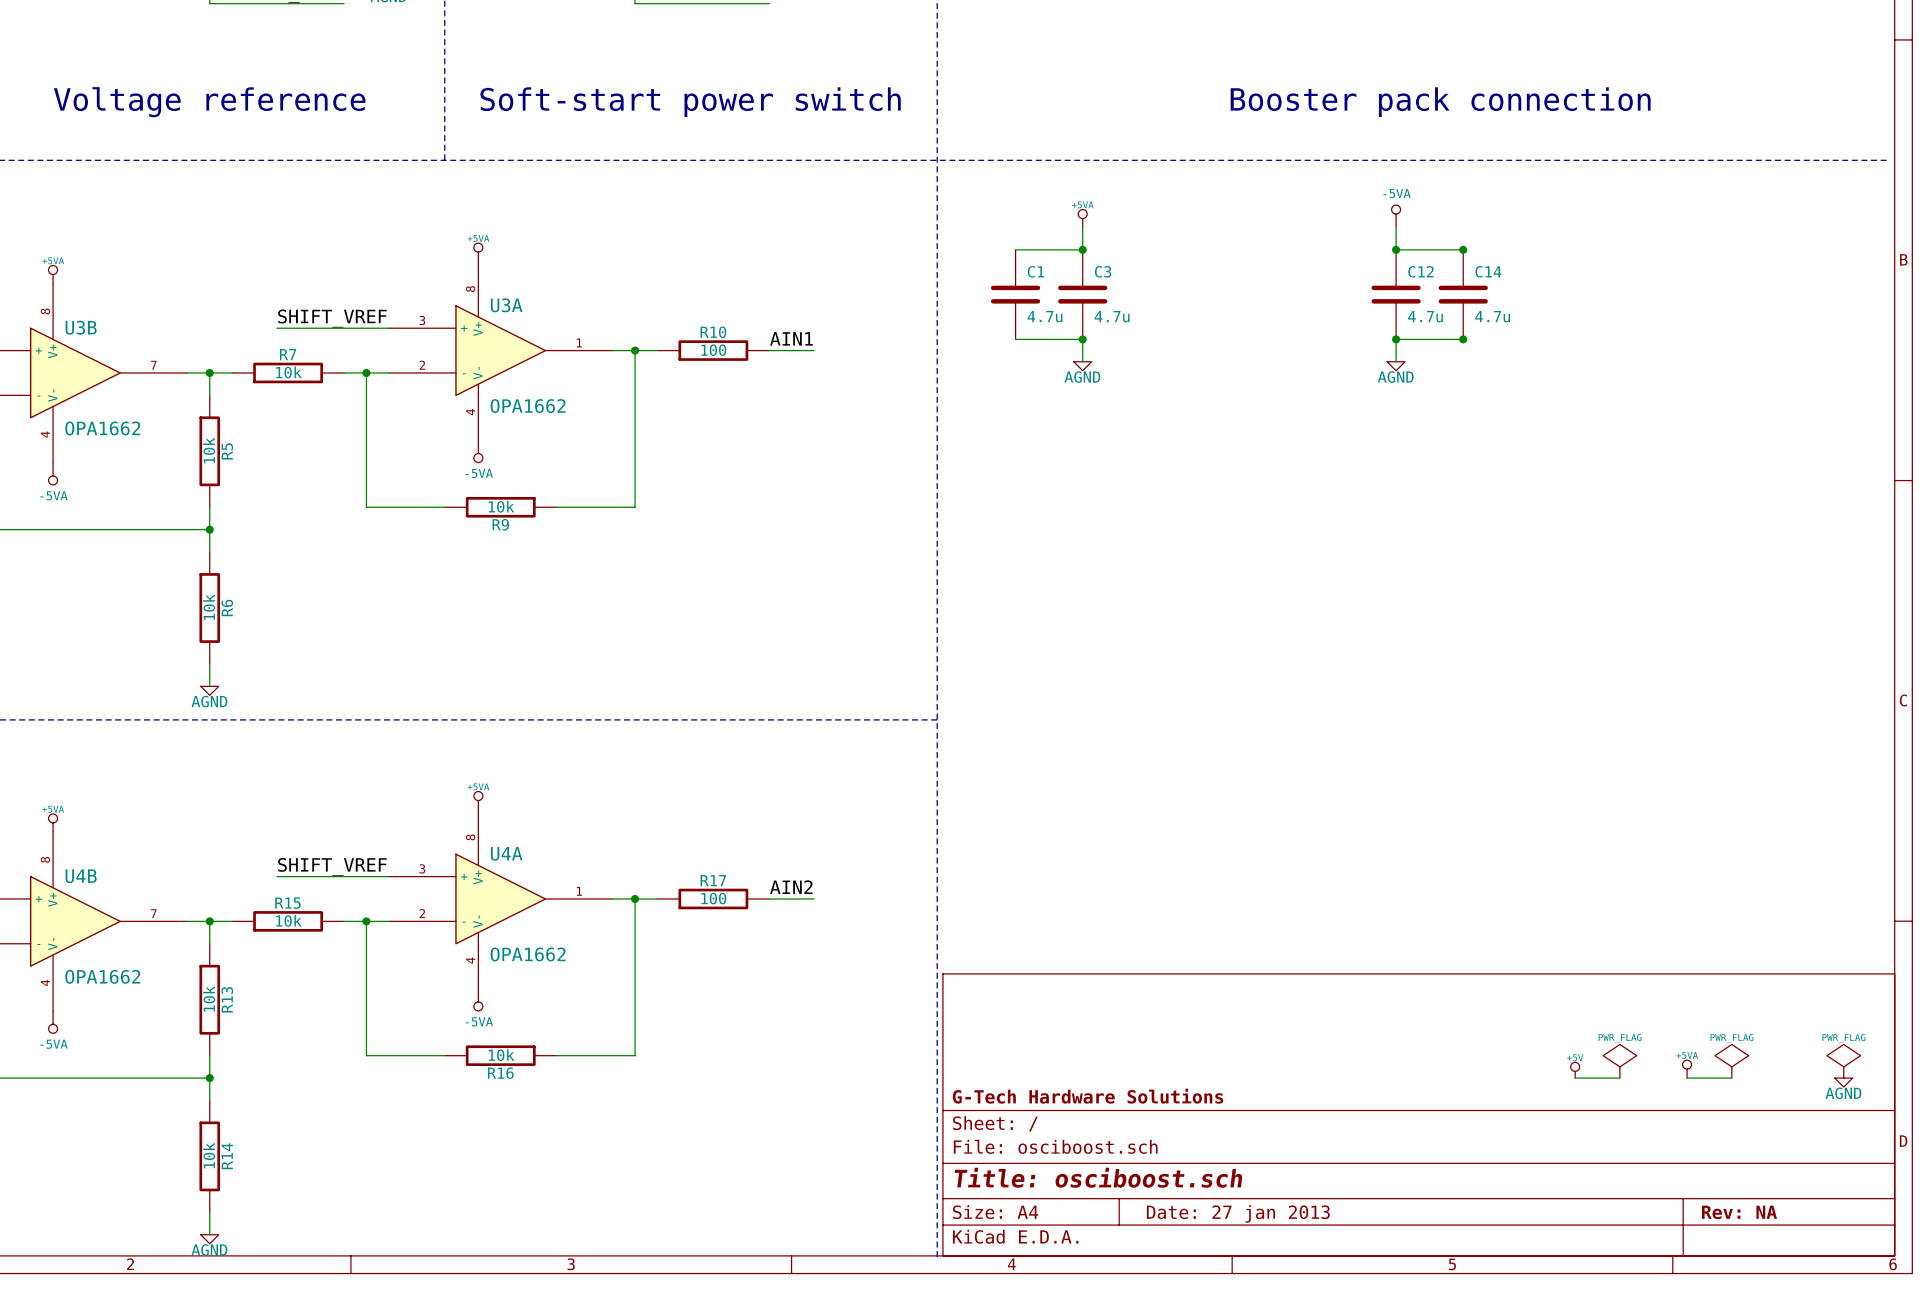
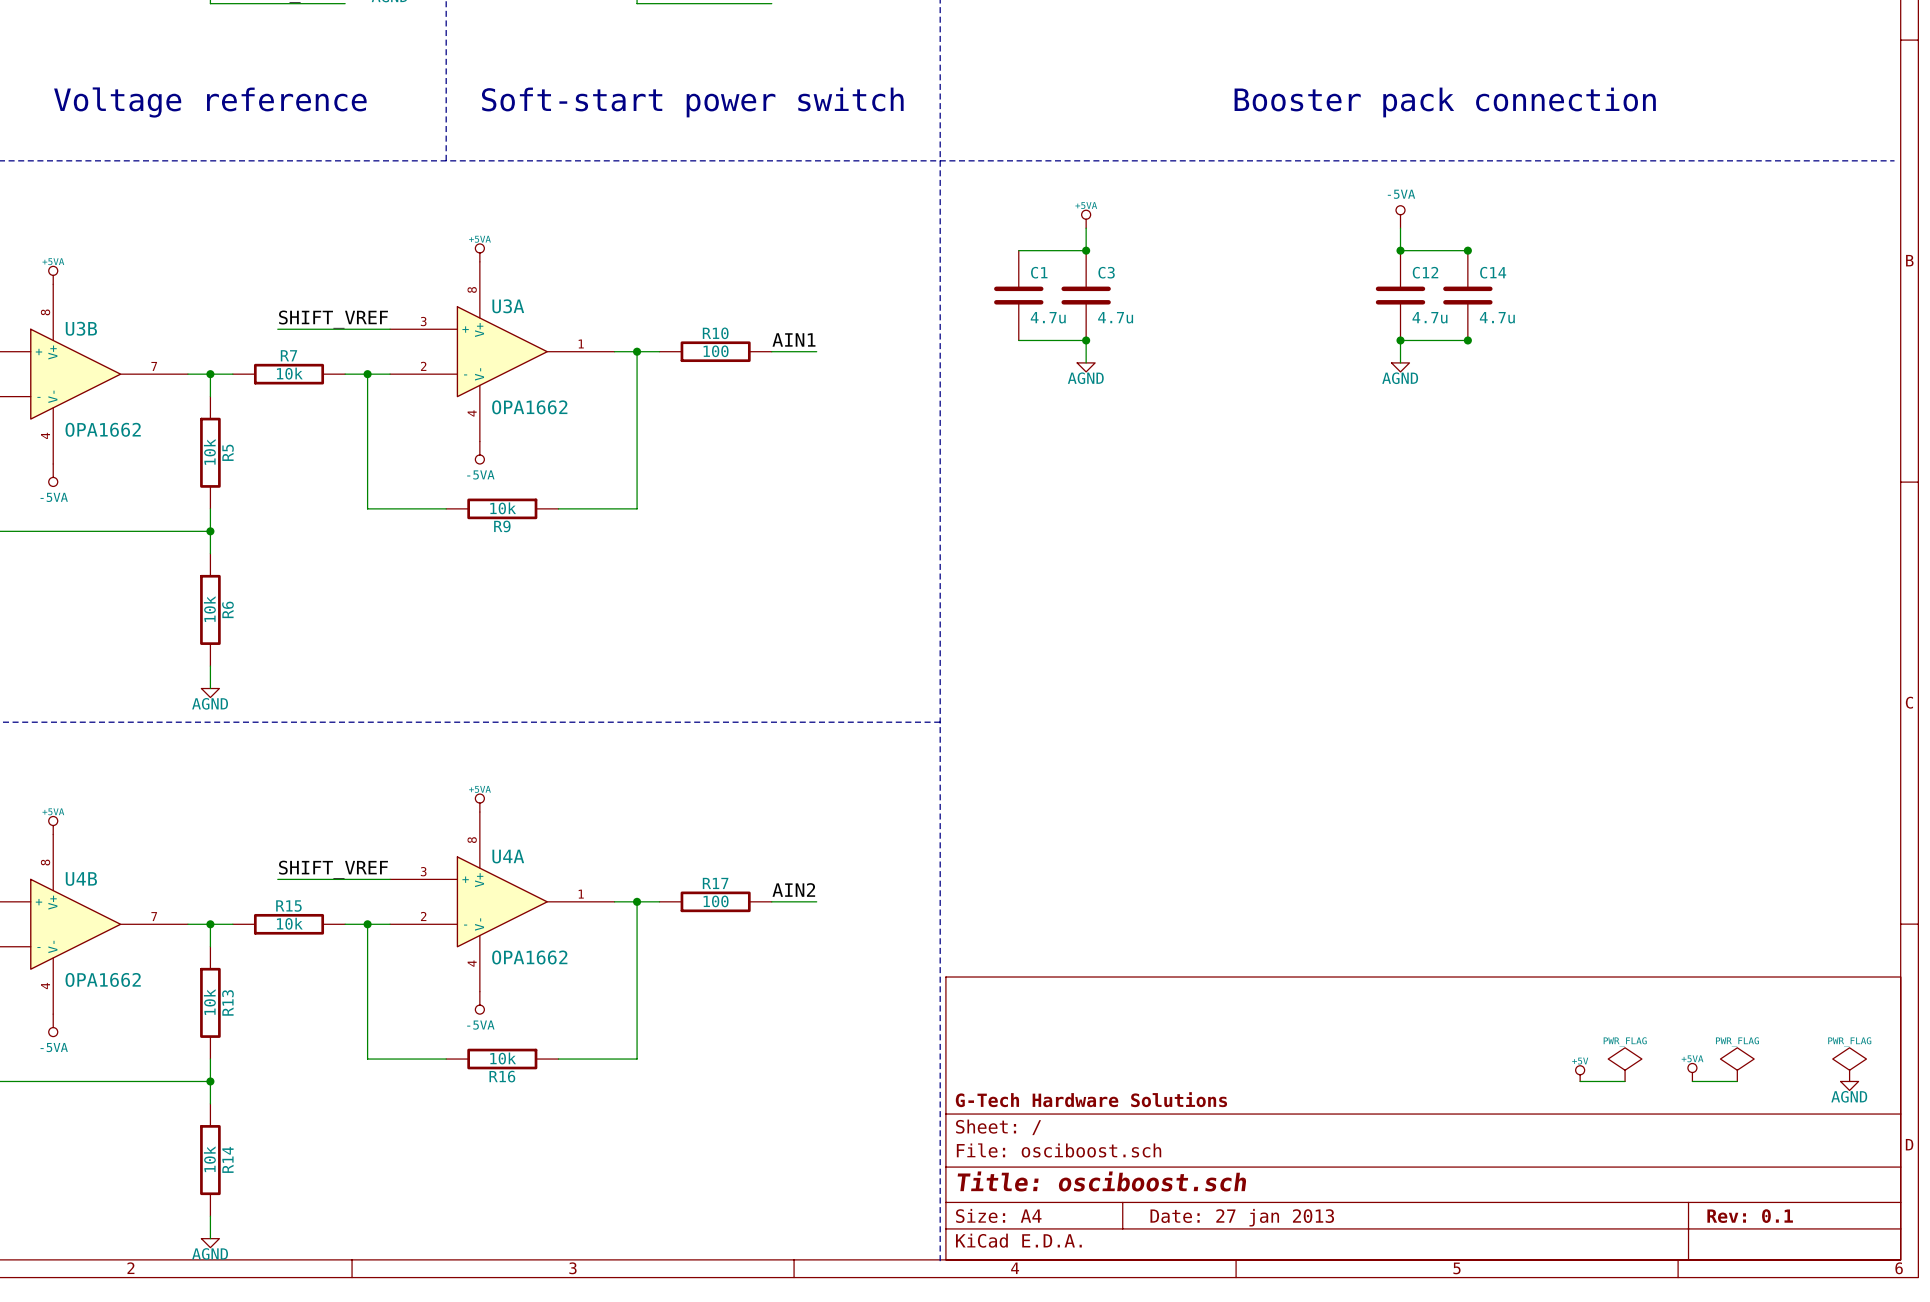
title block: Rev: NA (1739, 1212) -> Rev: 0.1 (1750, 1216)

